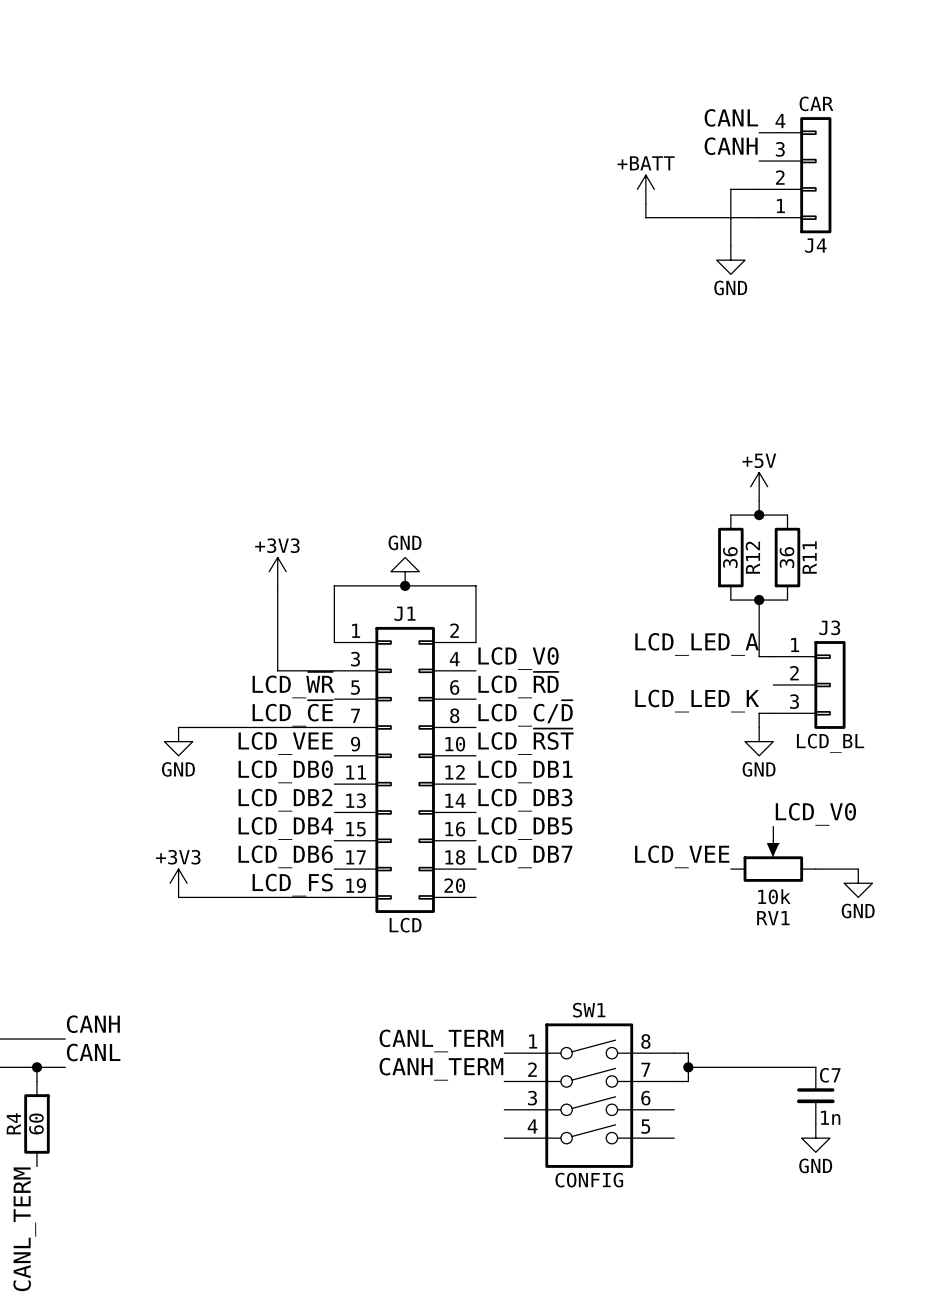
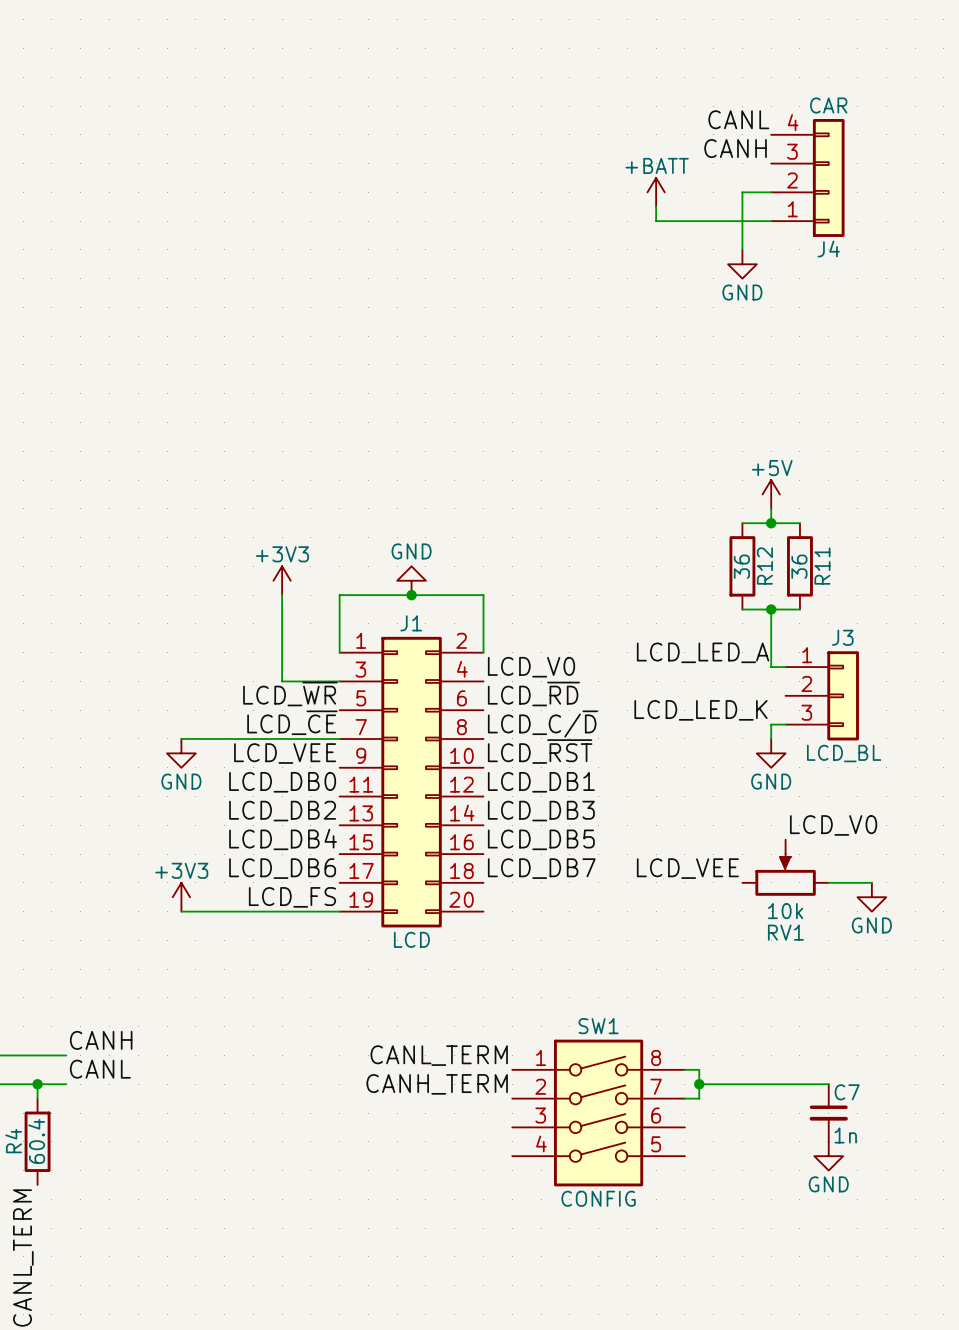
R4 value: 60 (36, 1123) -> 60.4 (36, 1141)

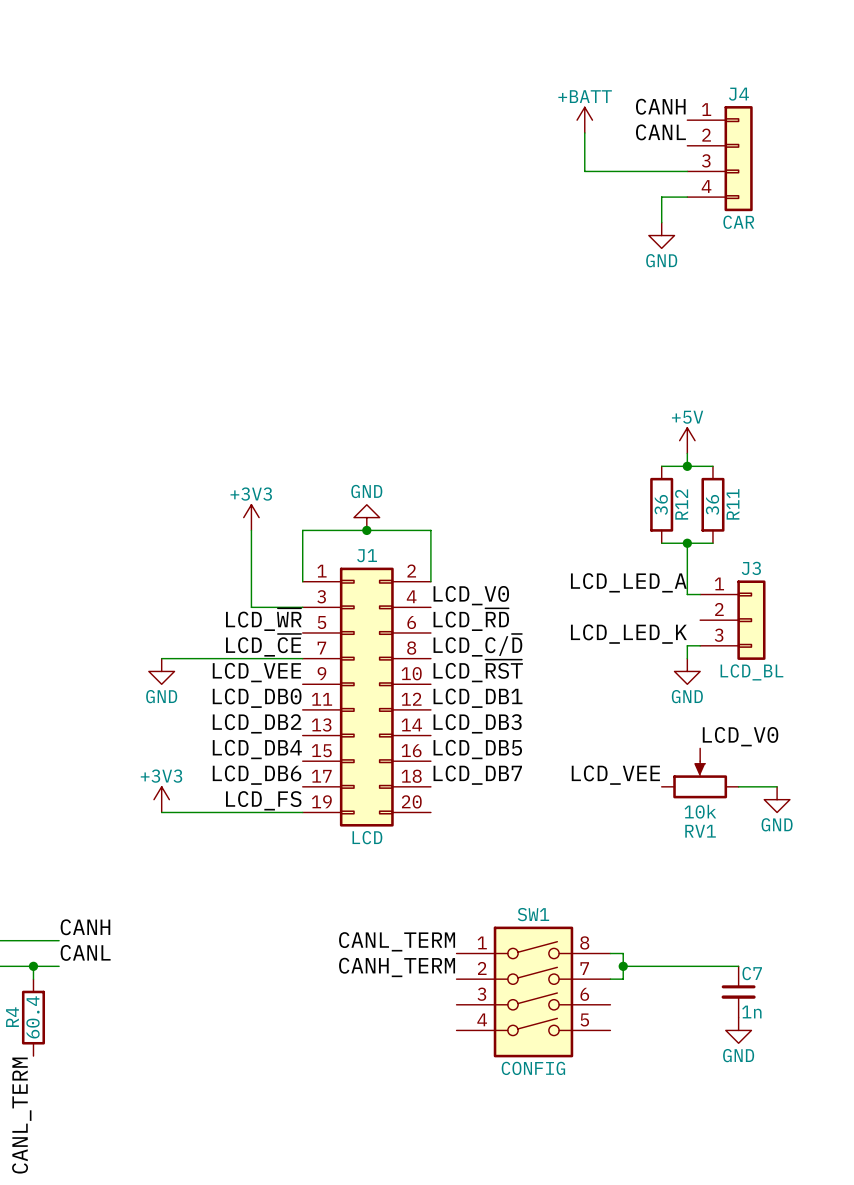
label: CANL (738, 119) -> CANH (660, 106)
label: CANH (735, 148) -> CANL (660, 132)
J4 flip: as is (828, 177) -> up-down (738, 158)
power symbol position: +BATT (656, 192) -> +BATT (584, 120)
wire: (742, 192) (742, 221) (656, 221) (656, 206) -> (661, 171) (584, 171) (584, 132)

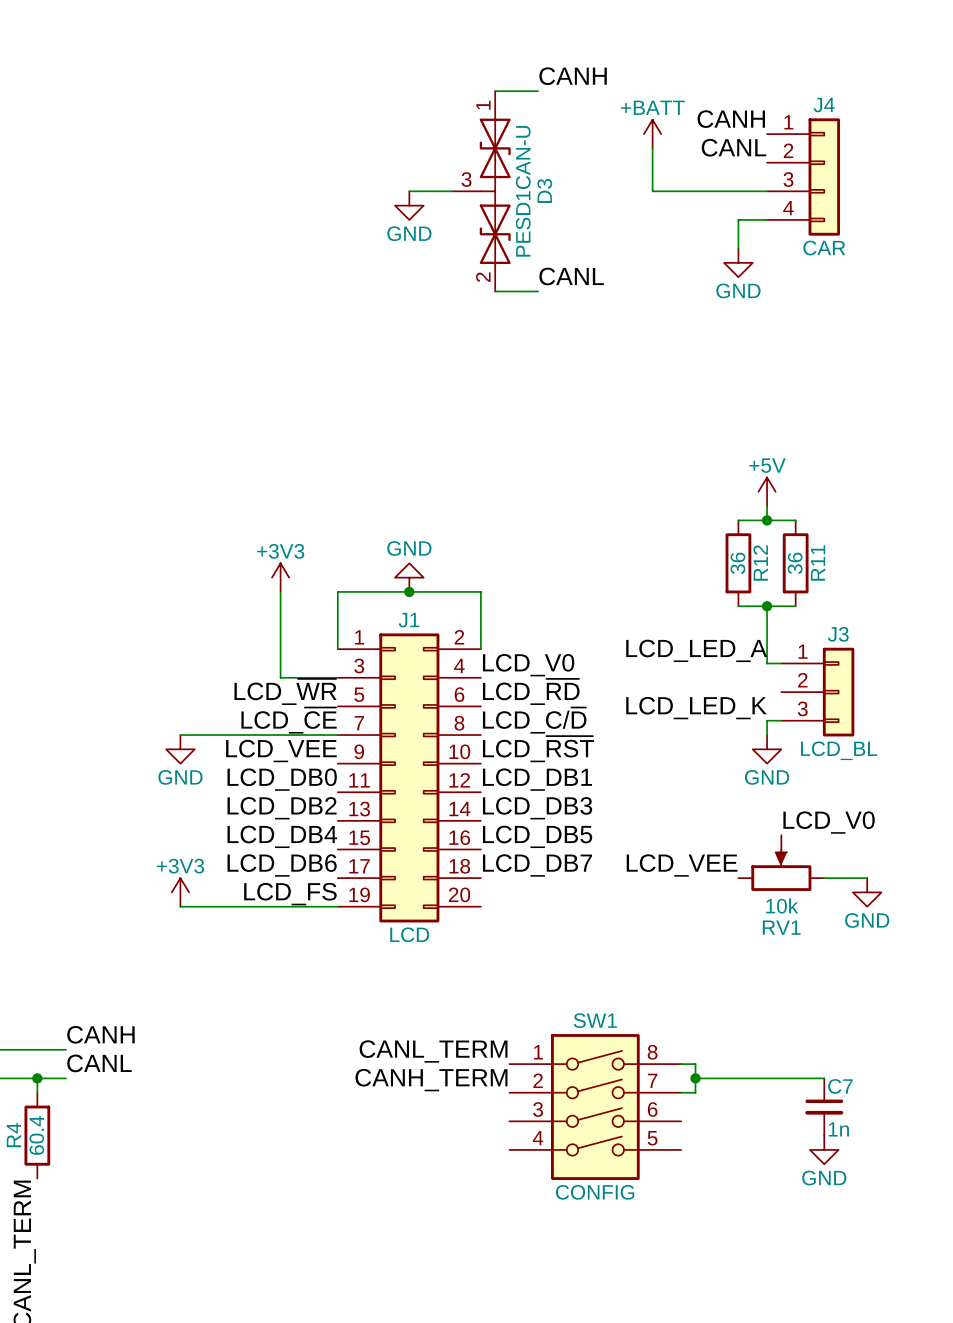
label: none -> CANH (573, 76)
wire: none -> (495, 91) (538, 91)
wire: none -> (409, 191) (452, 191)
D3: none -> PESD1CAN-U (481, 191)
power symbol: none -> GND (409, 205)
label: none -> CANL (571, 276)
wire: none -> (495, 291) (538, 291)

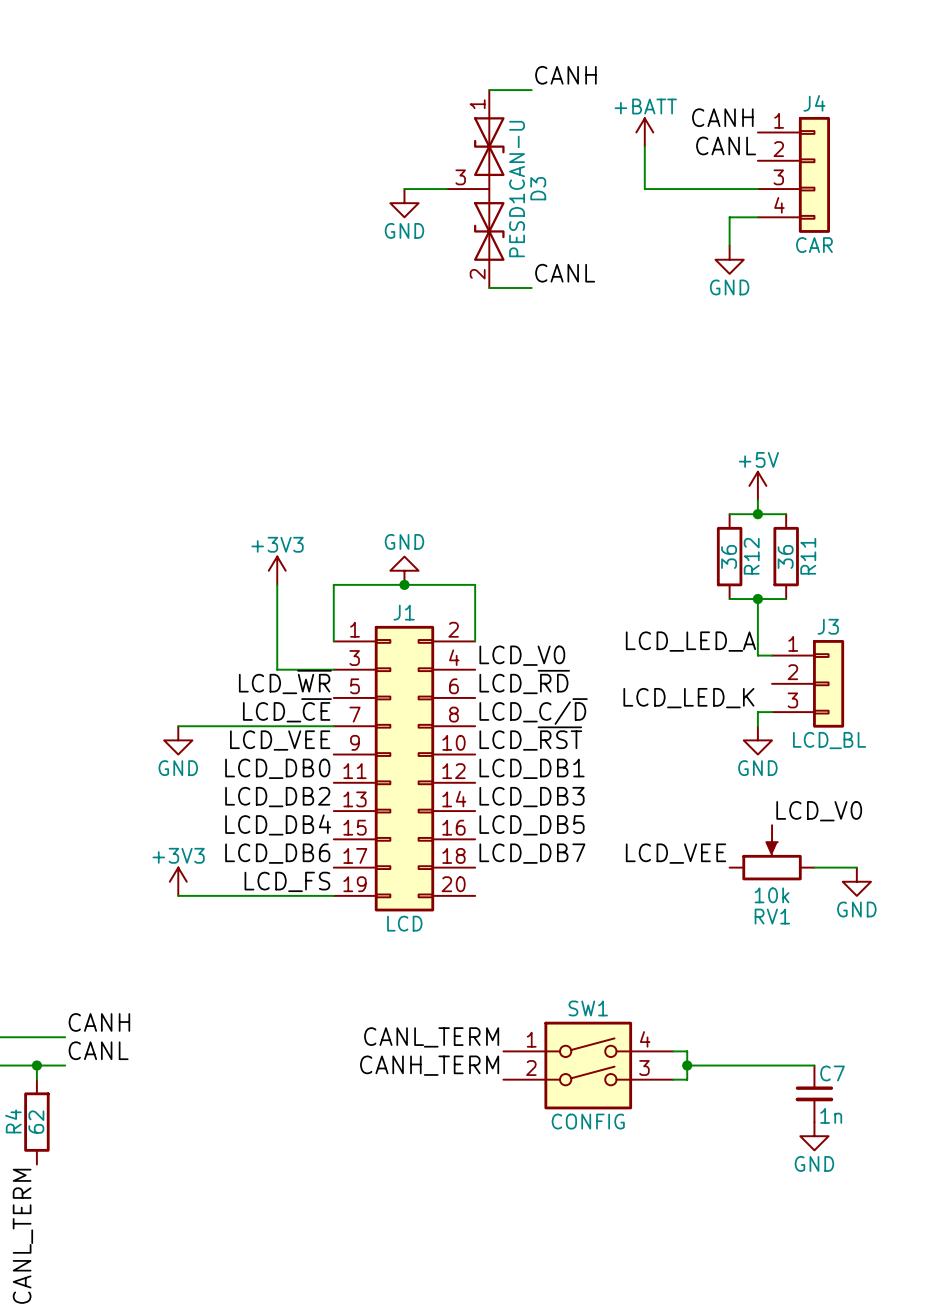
SW1 symbol: [509, 1034, 682, 1180] -> [503, 1021, 674, 1110]
R4 value: 60.4 (36, 1135) -> 62 (36, 1122)
SW1 value position: CONFIG (595, 1192) -> CONFIG (588, 1121)

